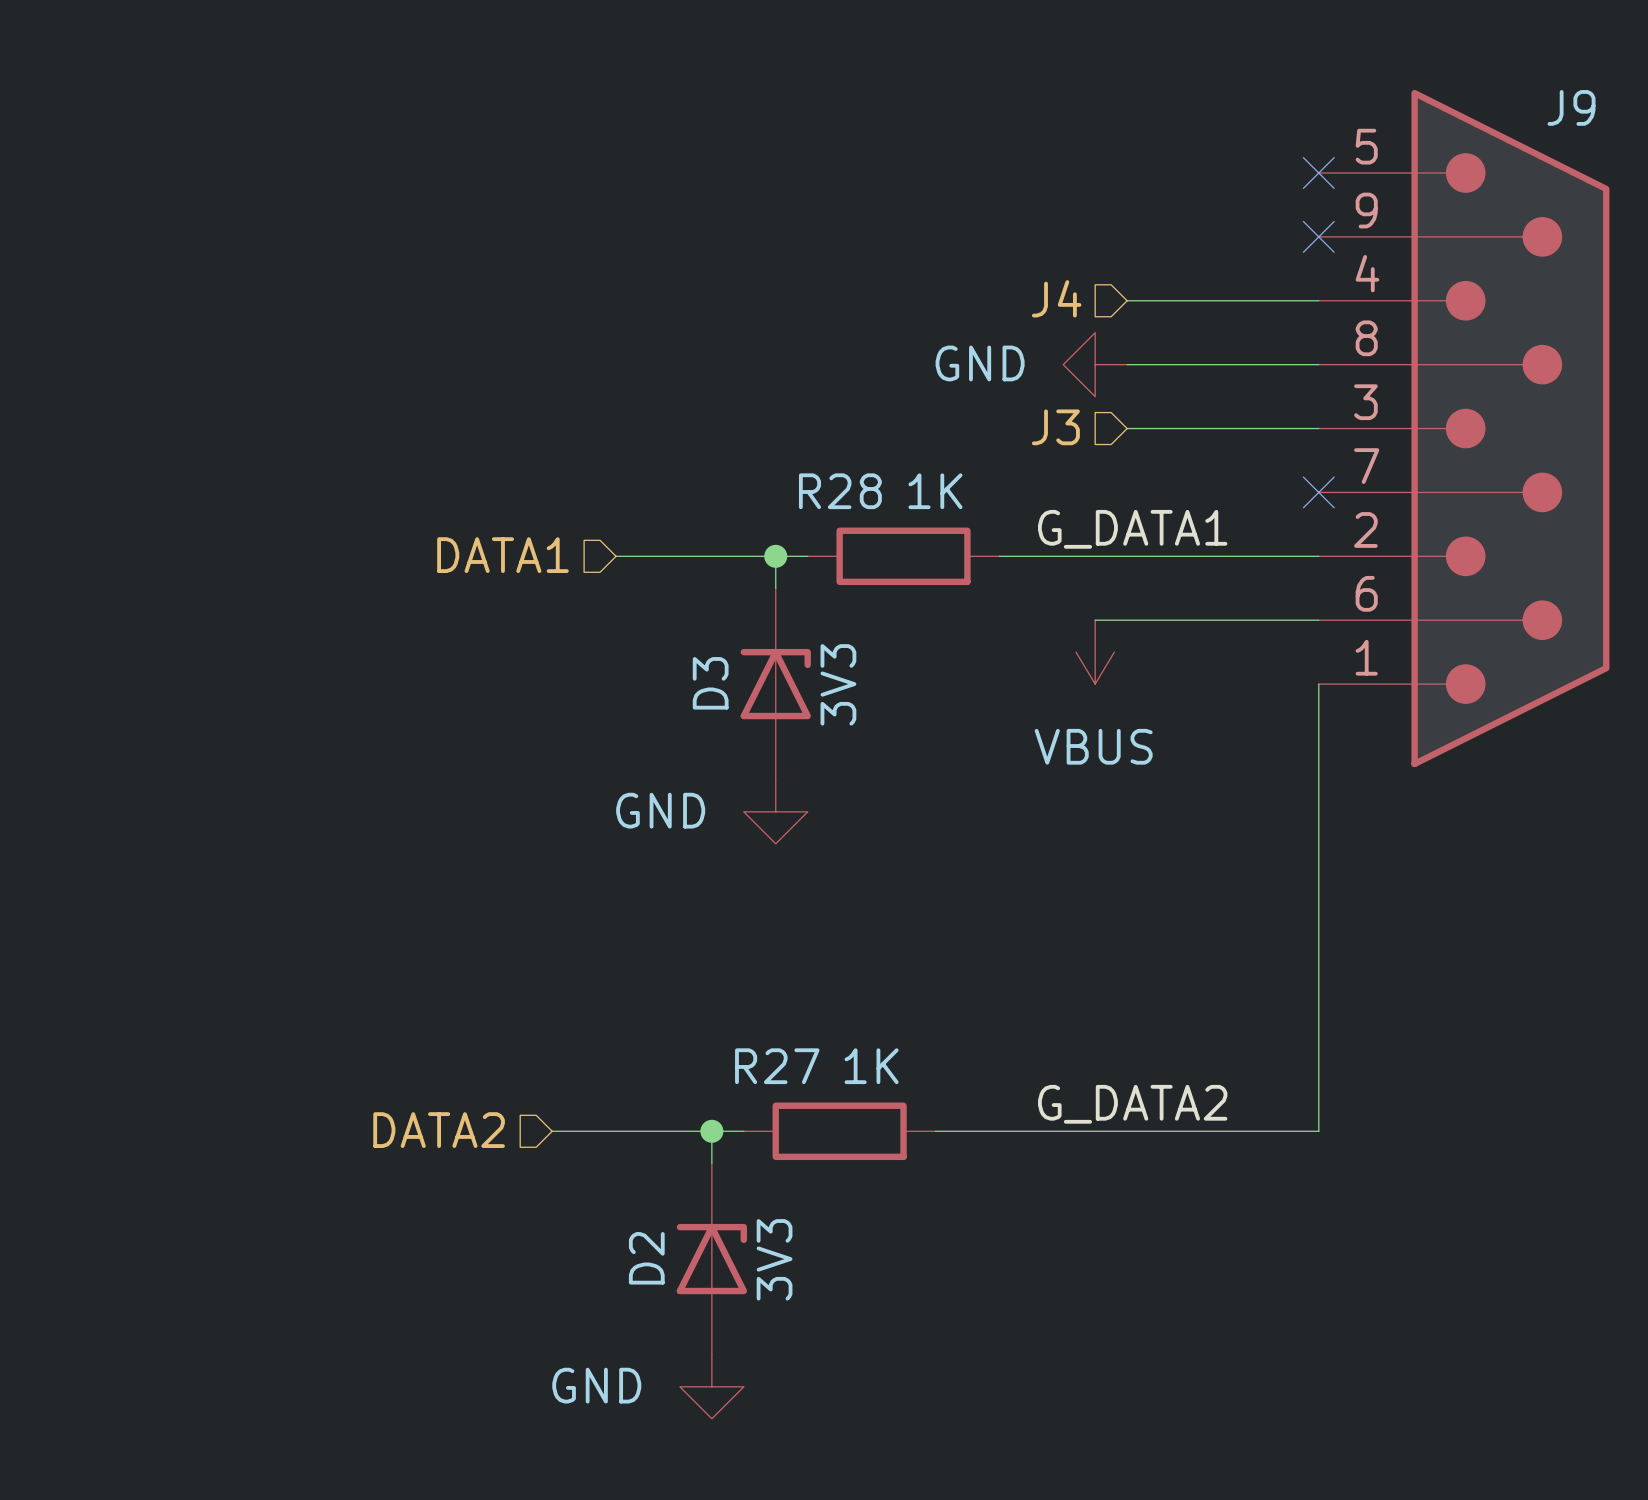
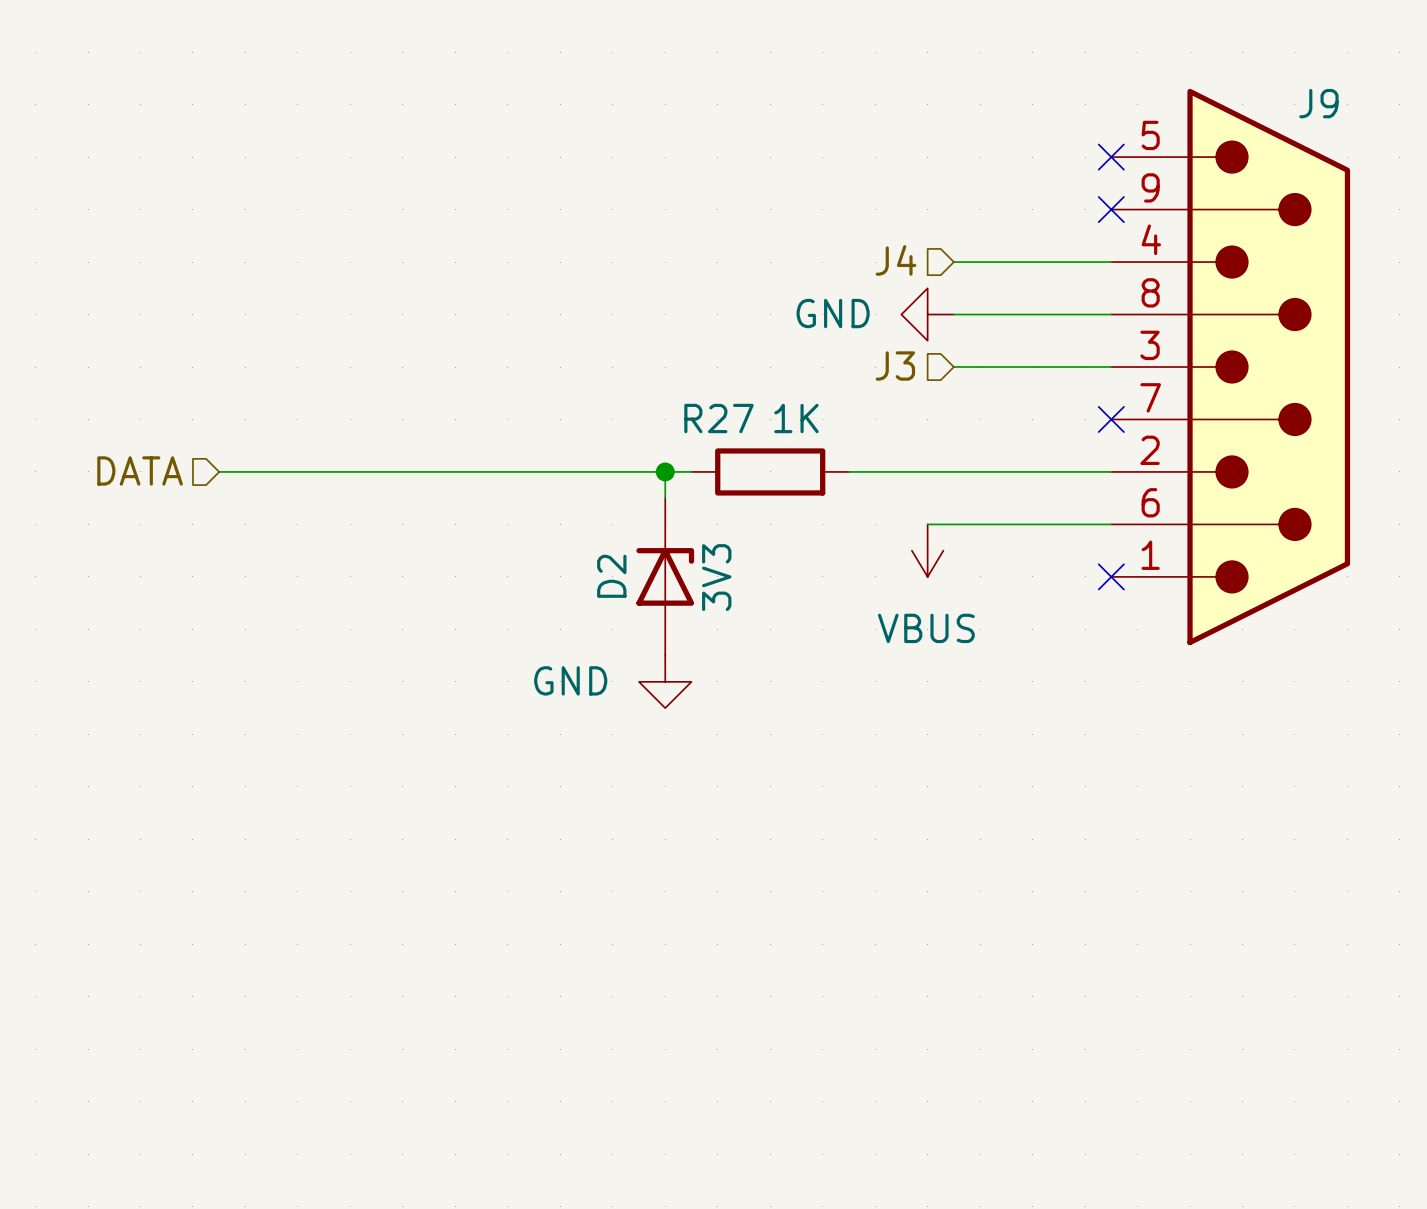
R28 name: R28 (840, 491) -> R27 (718, 418)
label: G_DATA1 (1132, 529) -> none
hierarchical label: none -> DATA (140, 470)
hierarchical label: DATA1 (502, 555) -> none
wire: none -> (219, 471) (534, 471)
D3 name: D3 (710, 683) -> D2 (611, 576)
wire: (1318, 684) (1318, 1131) (935, 1131) -> none
no-connect mark: none -> (1111, 576)
label: G_DATA2 (1132, 1104) -> none
hierarchical label: DATA2 (439, 1130) -> none
wire: (552, 1131) (743, 1131) -> none
wire: (711, 1131) (711, 1163) -> none
junction: (711, 1131) -> none
R27: 1K (839, 1131) -> none
D2: 3V3 (711, 1259) -> none
power symbol: GND (711, 1386) -> none

